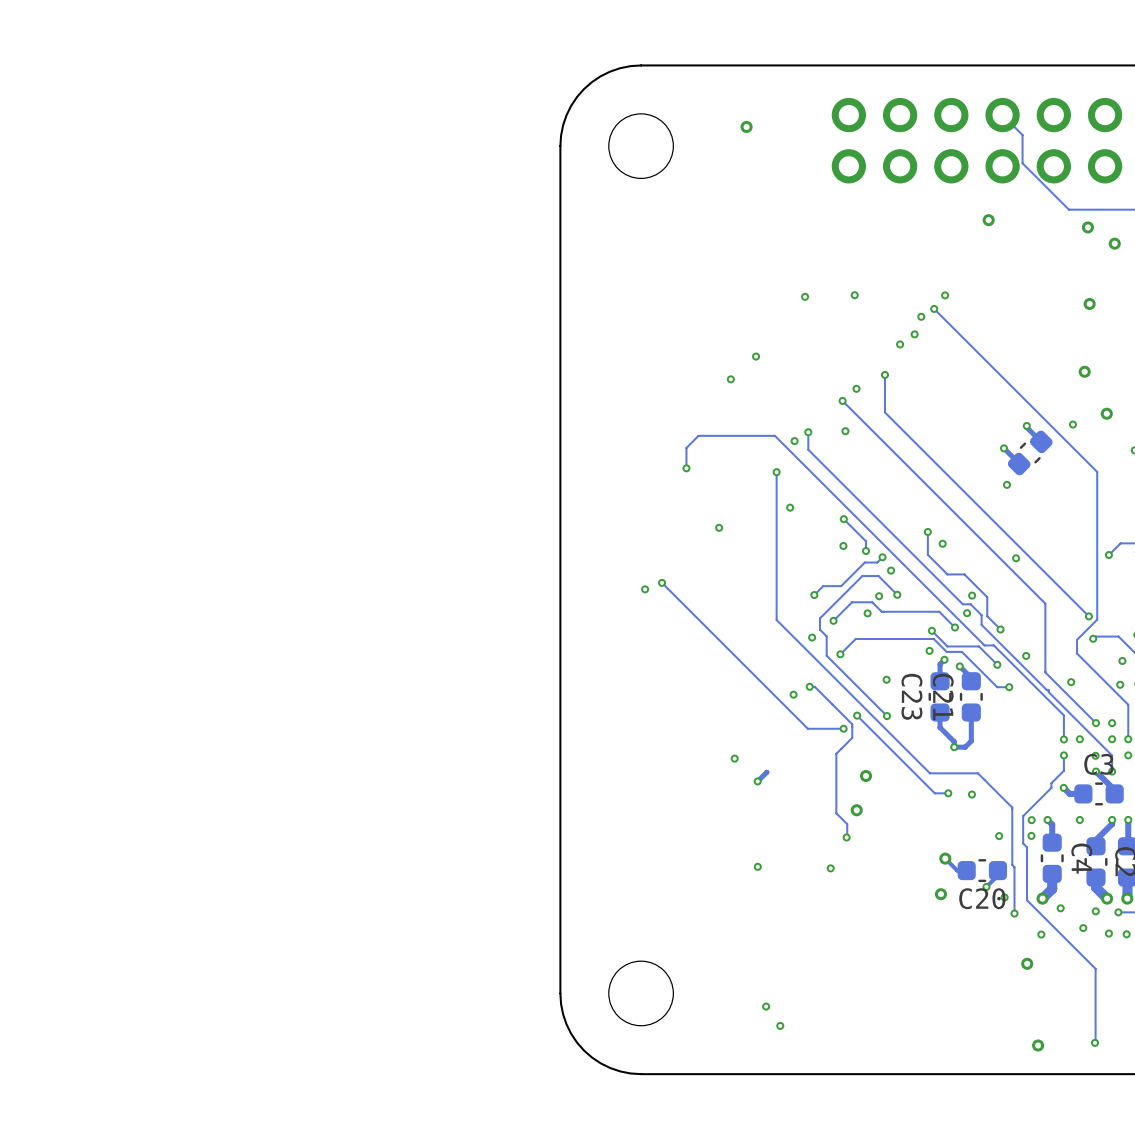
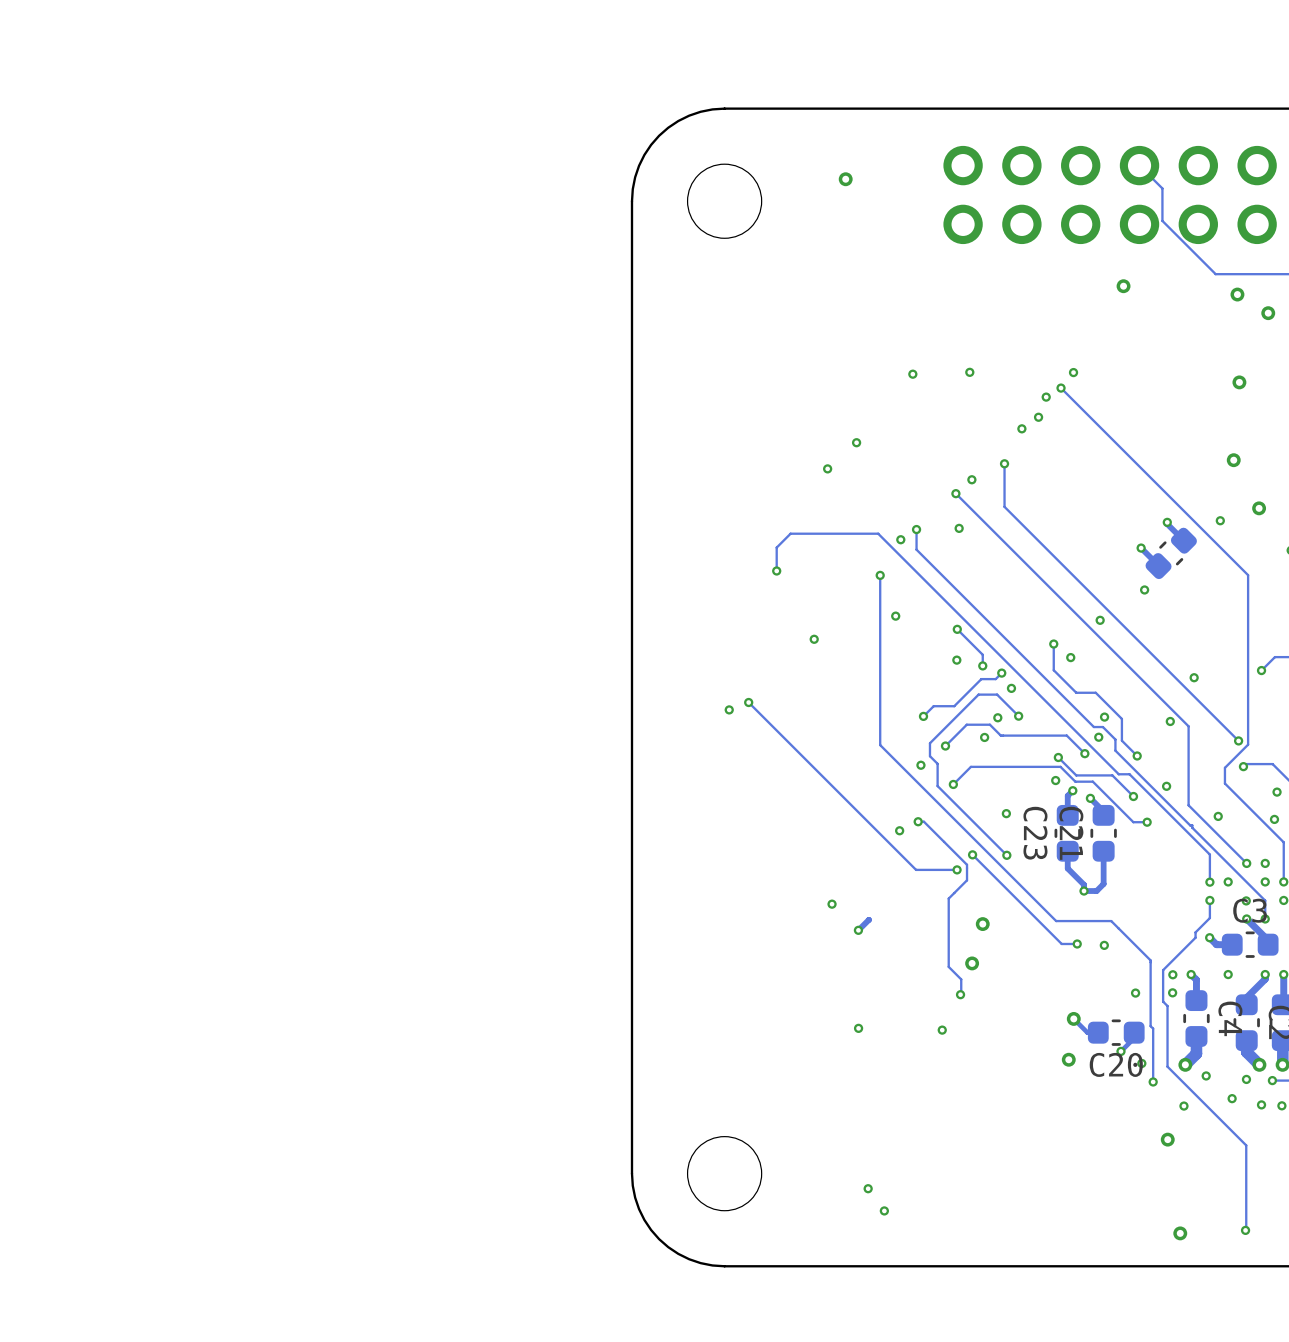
via: none -> (1100, 620)
via: (1016, 558) -> none
via: none -> (1194, 677)
via: none -> (1170, 721)

